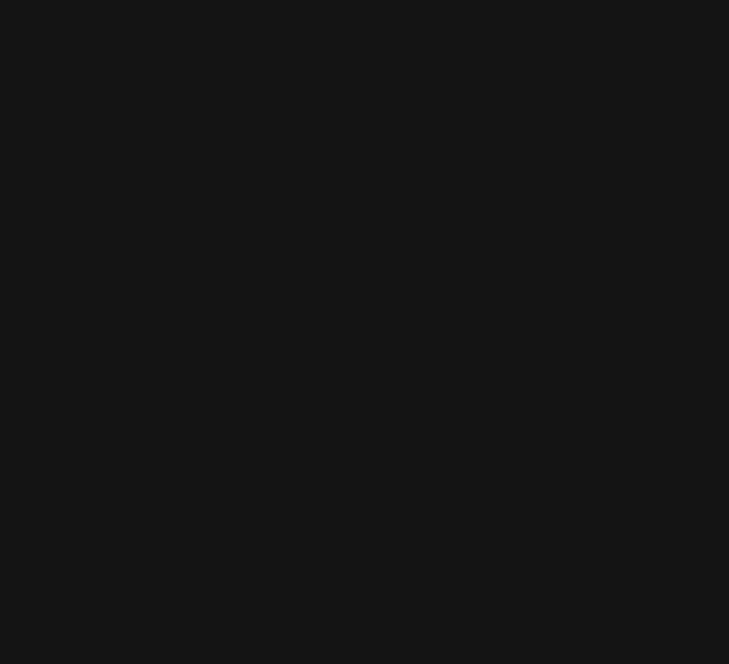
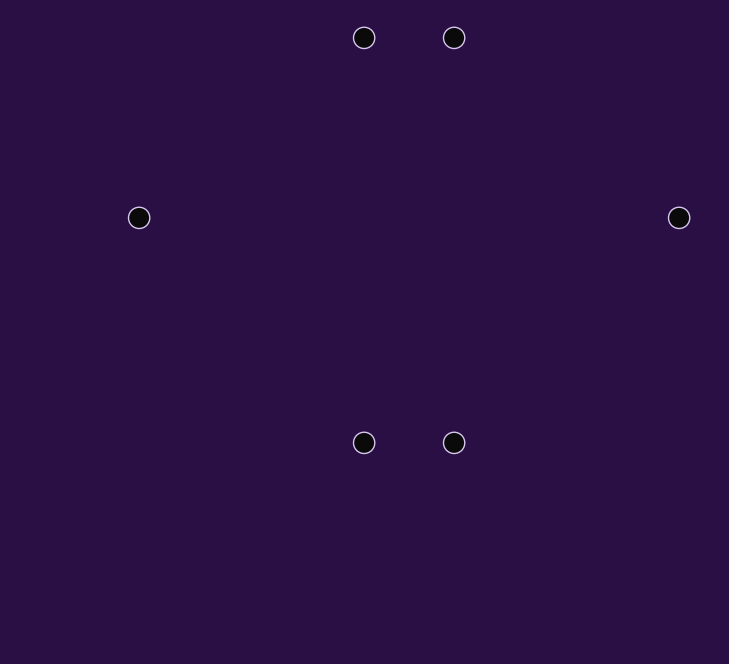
hole: none -> (364, 37)
hole: none -> (454, 37)
hole: none -> (139, 217)
hole: none -> (679, 217)
hole: none -> (364, 442)
hole: none -> (454, 442)

